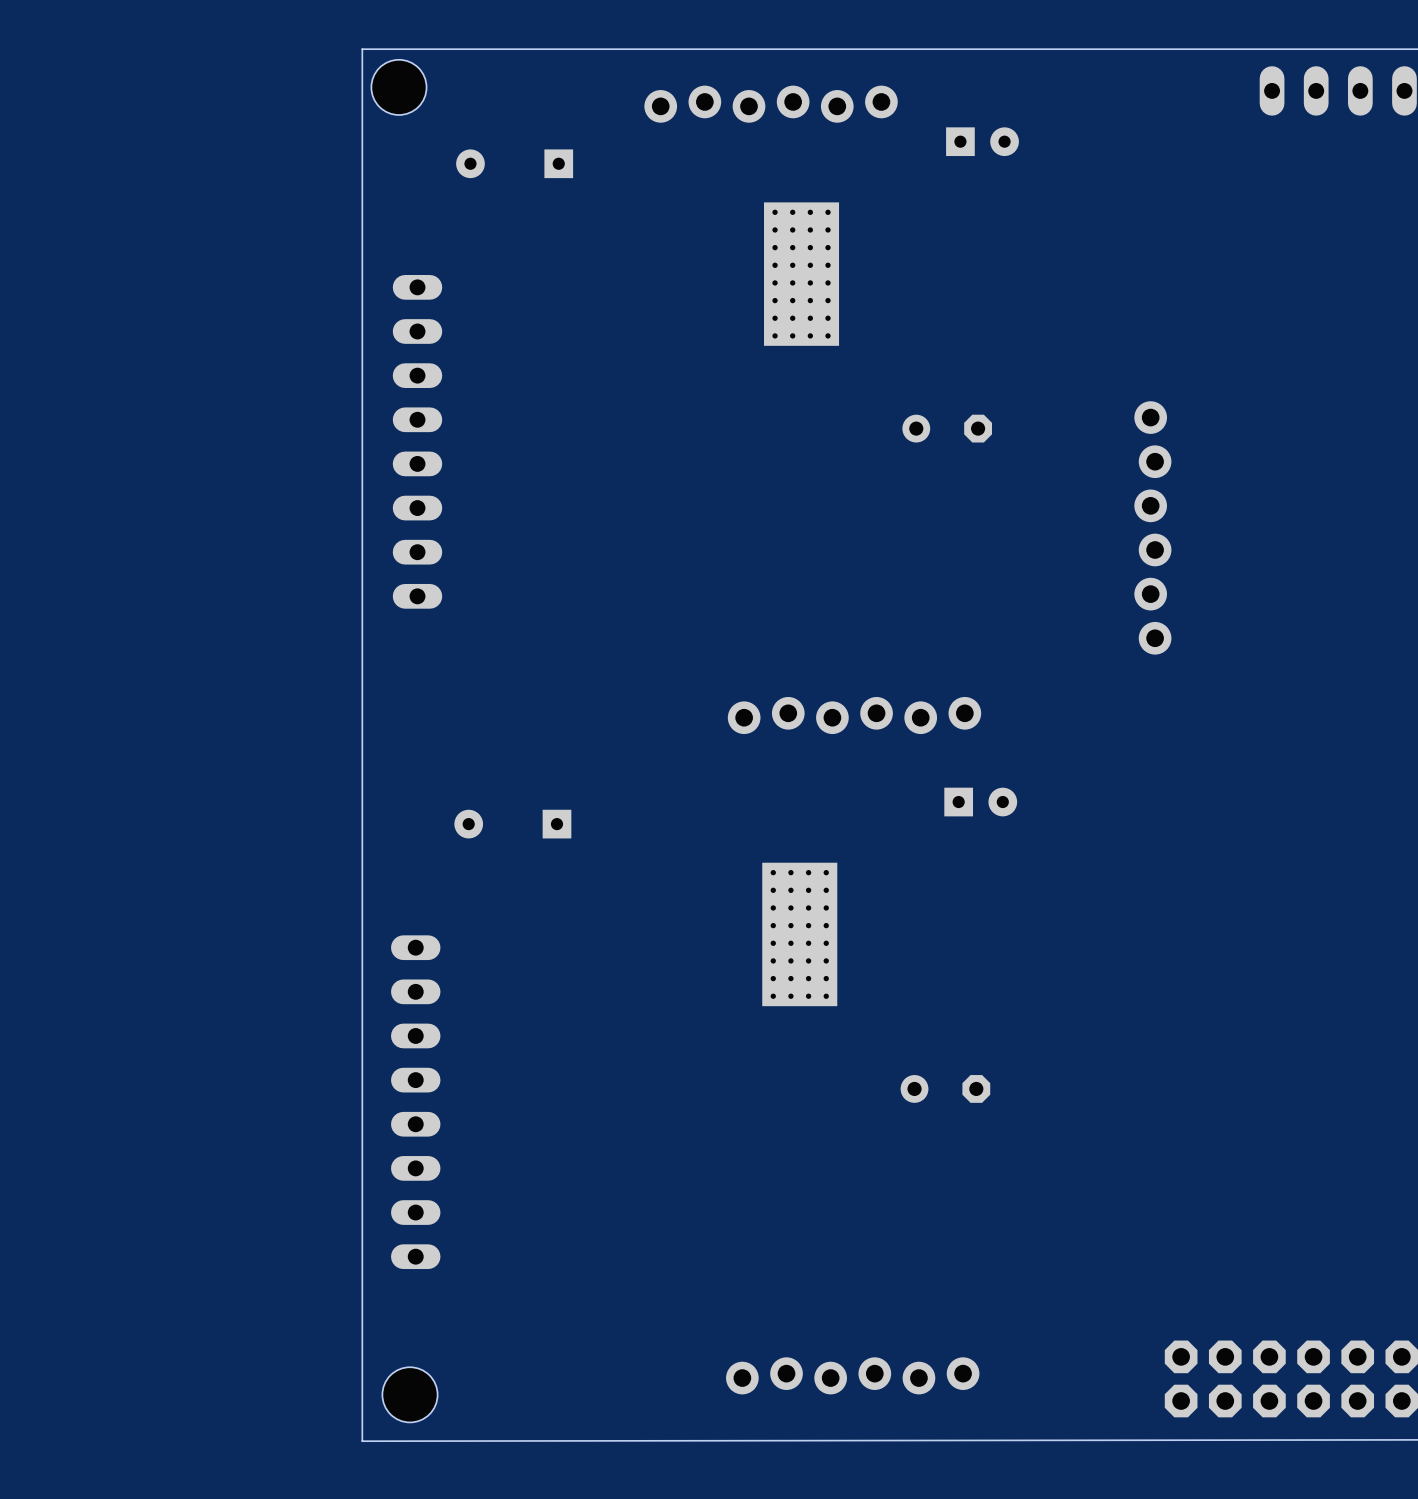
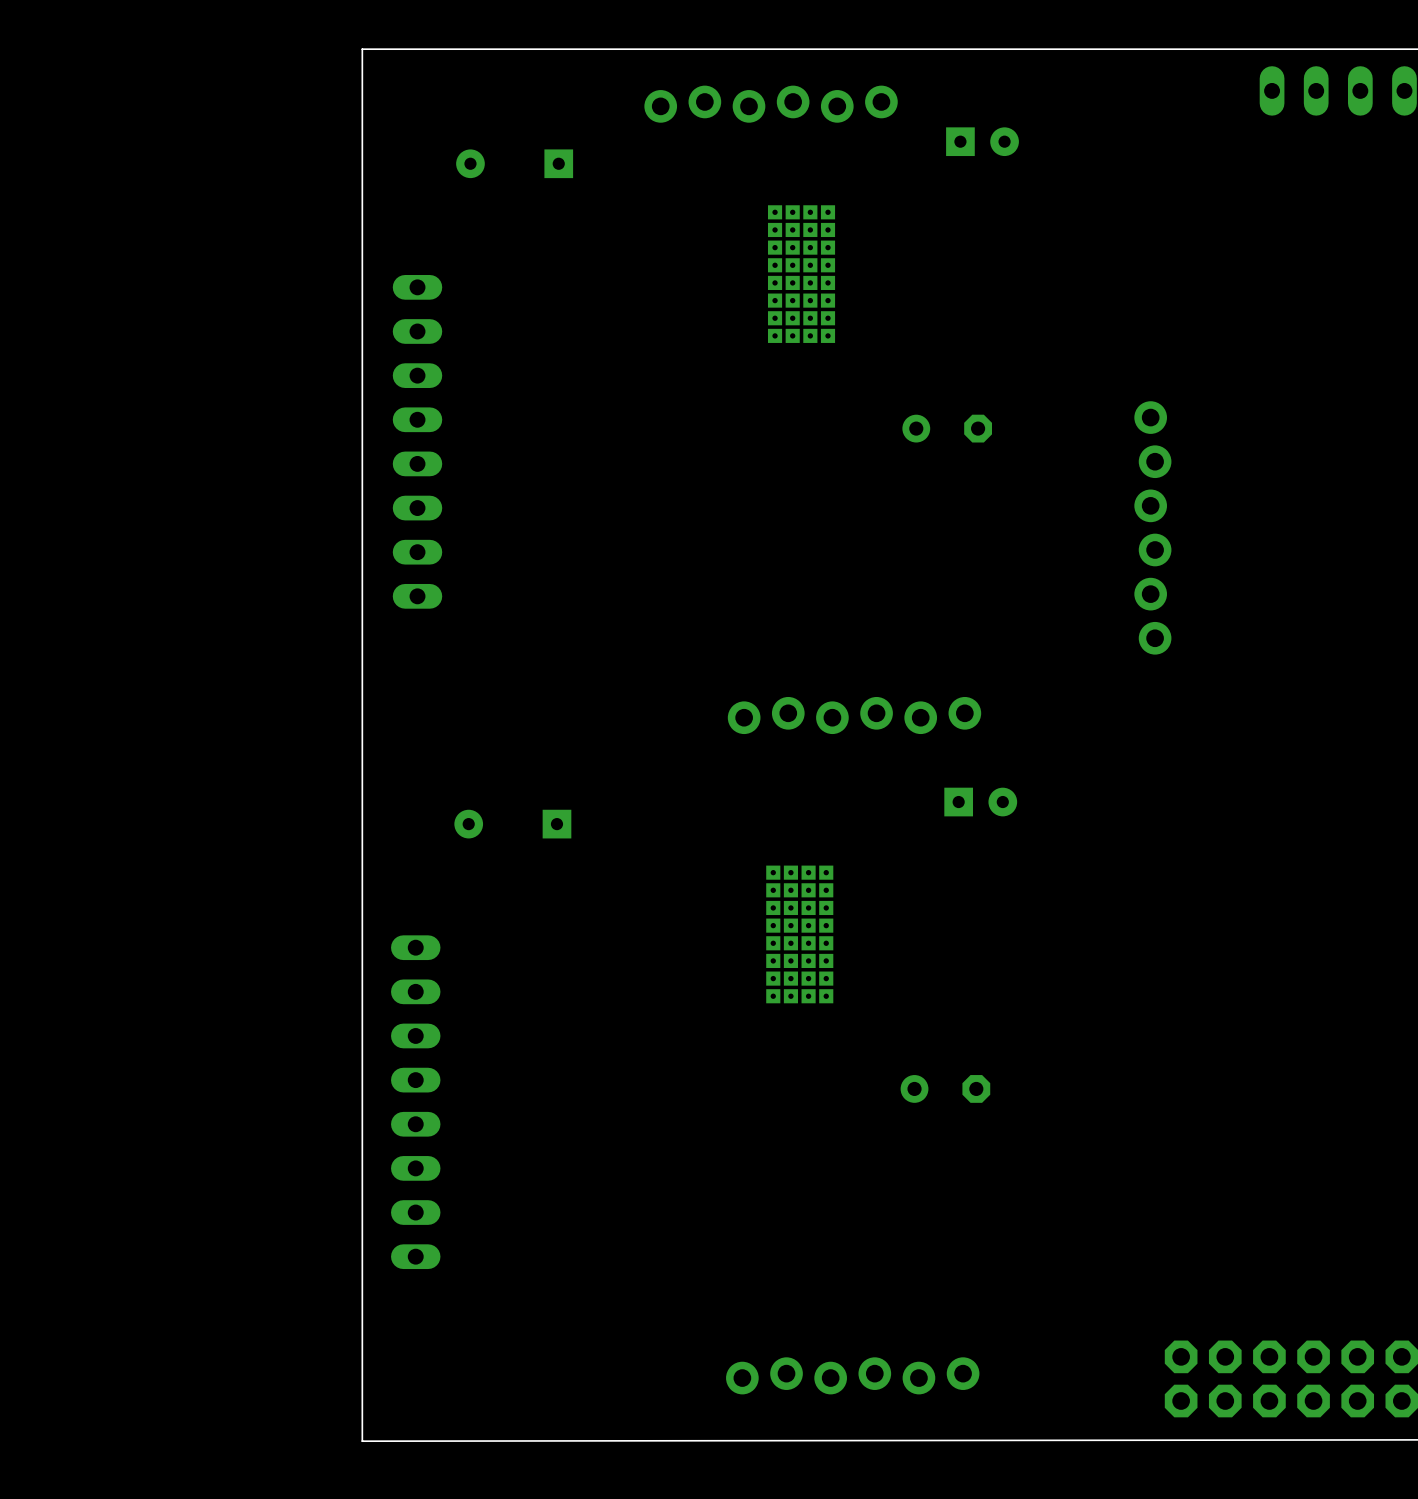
hole: (398, 87) -> none
part footprint: [764, 202, 840, 346] -> [767, 205, 836, 343]
part footprint: [762, 862, 838, 1007] -> [766, 865, 834, 1004]
hole: (410, 1394) -> none

